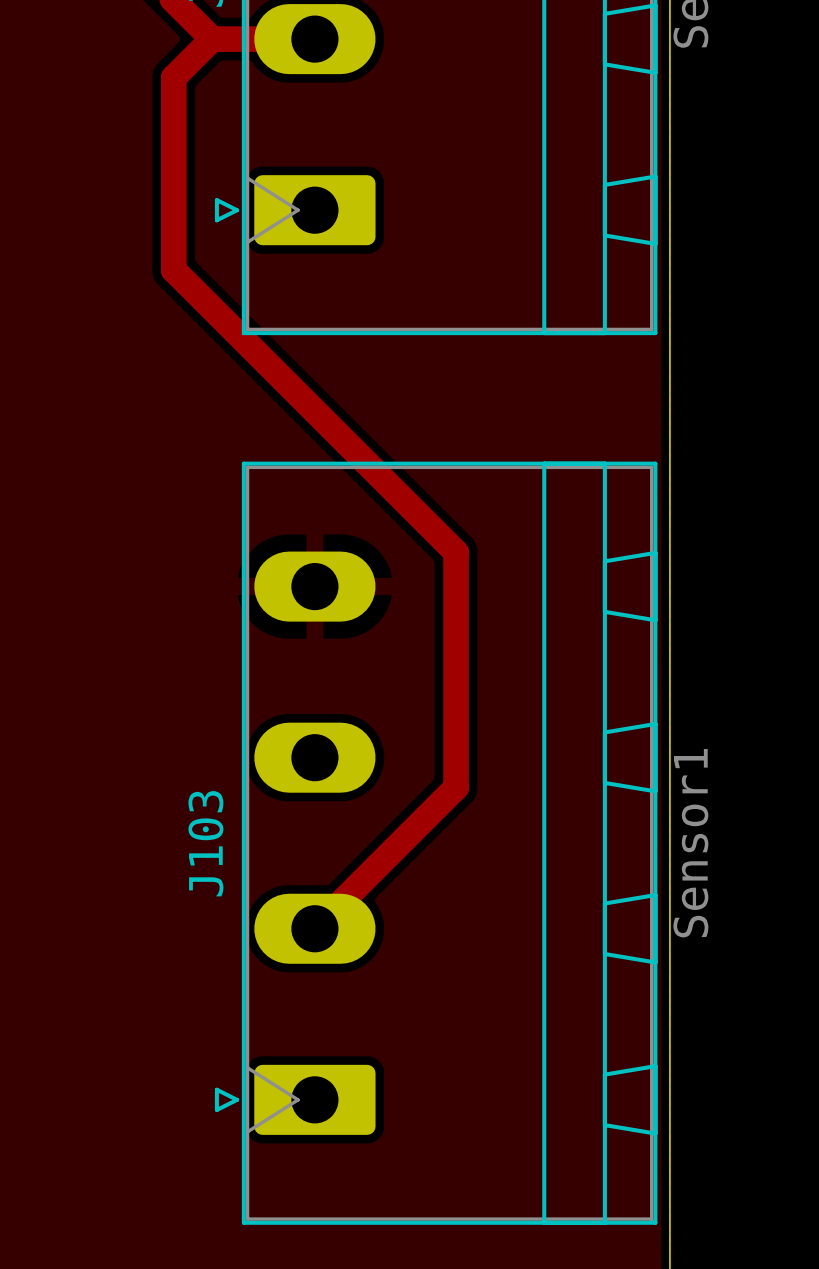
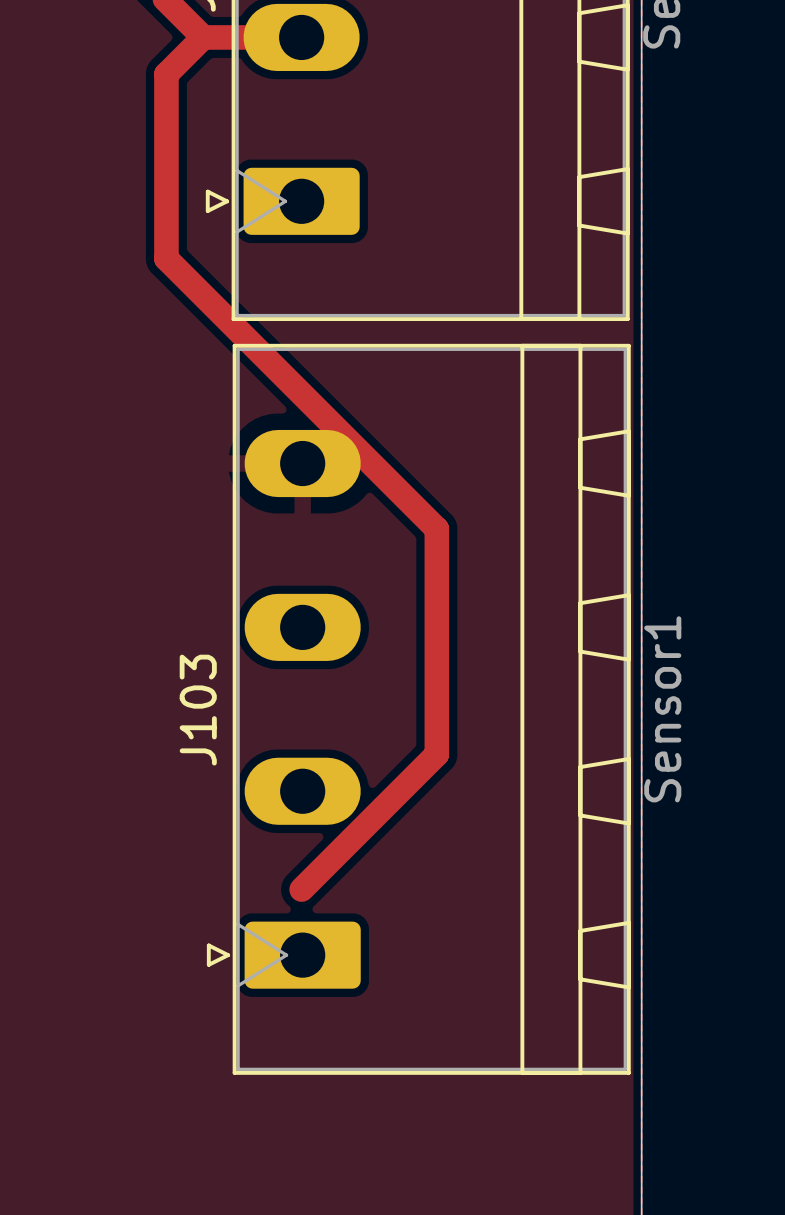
J103 position: (436, 843) -> (418, 709)

